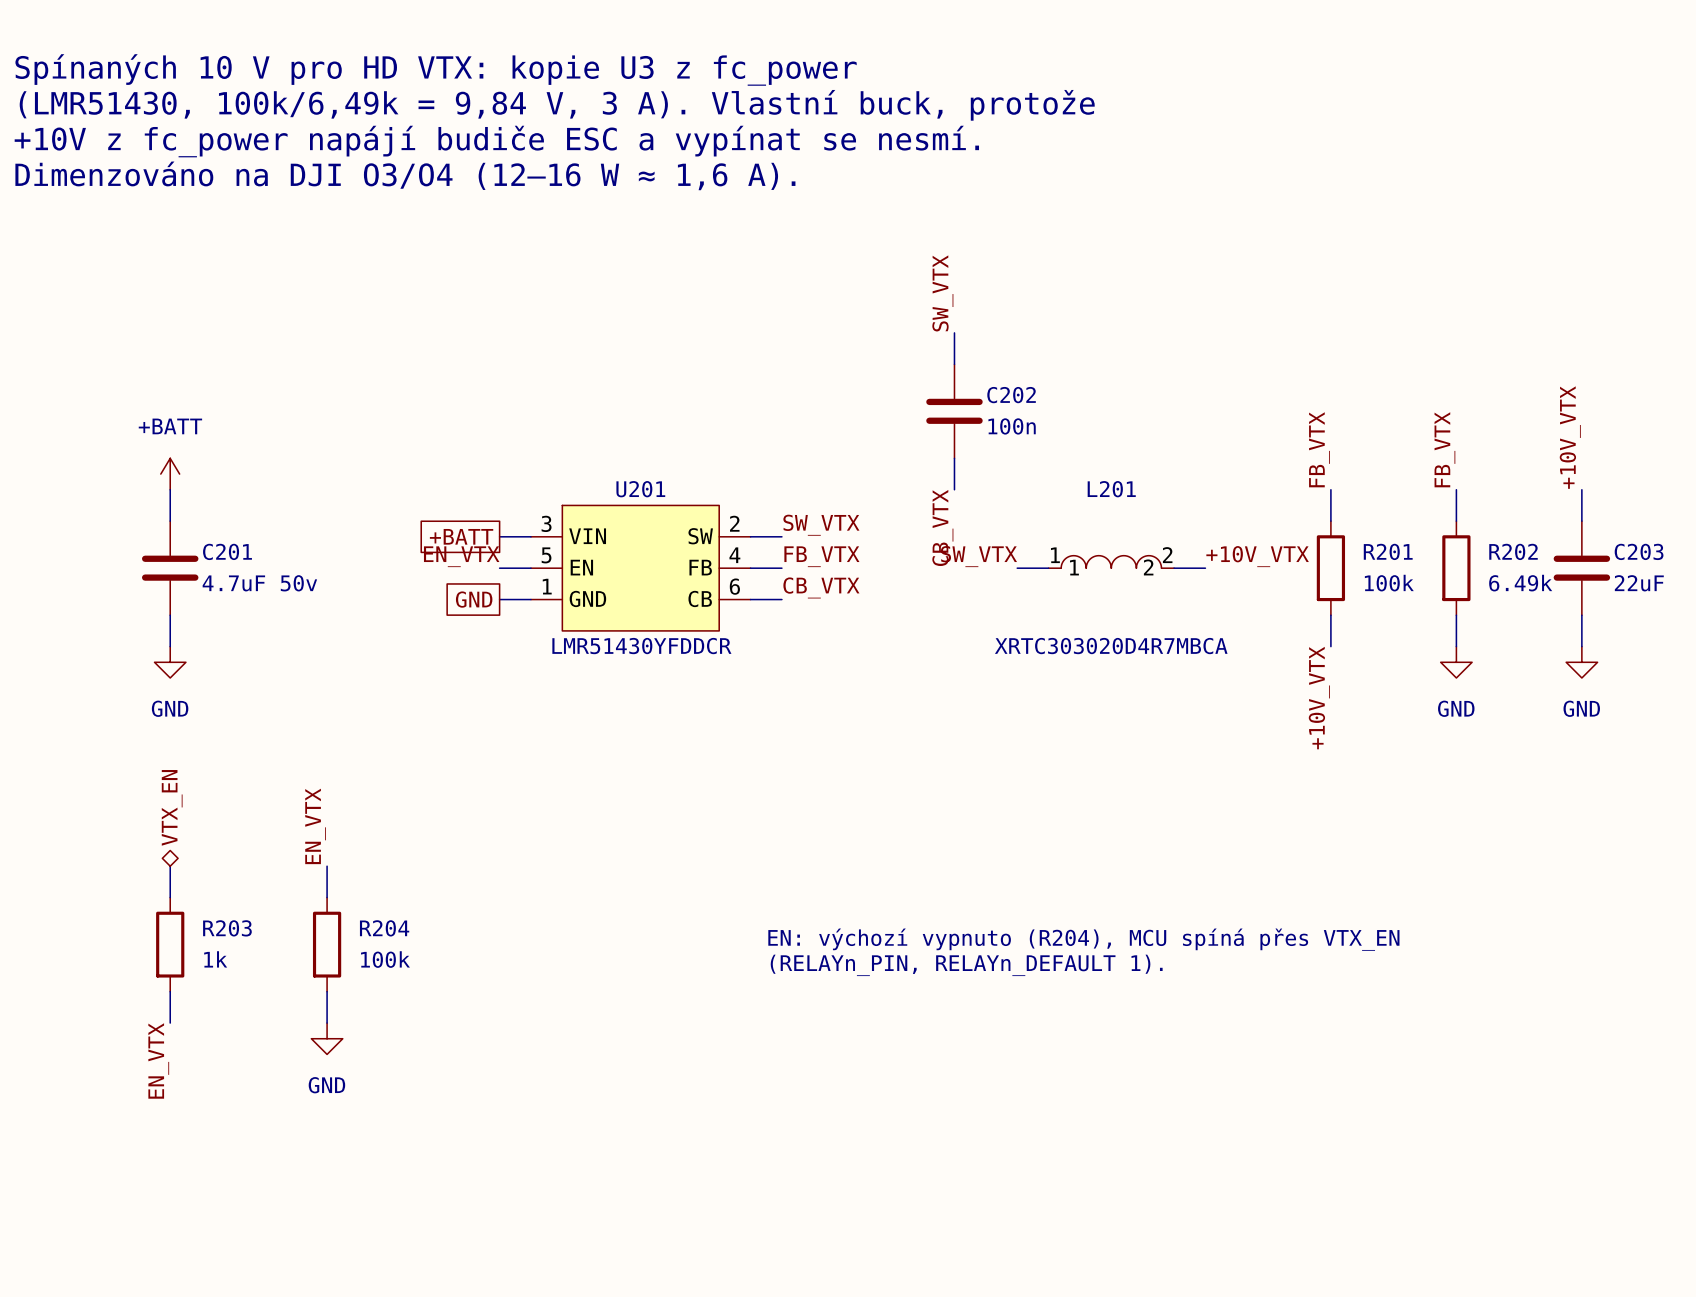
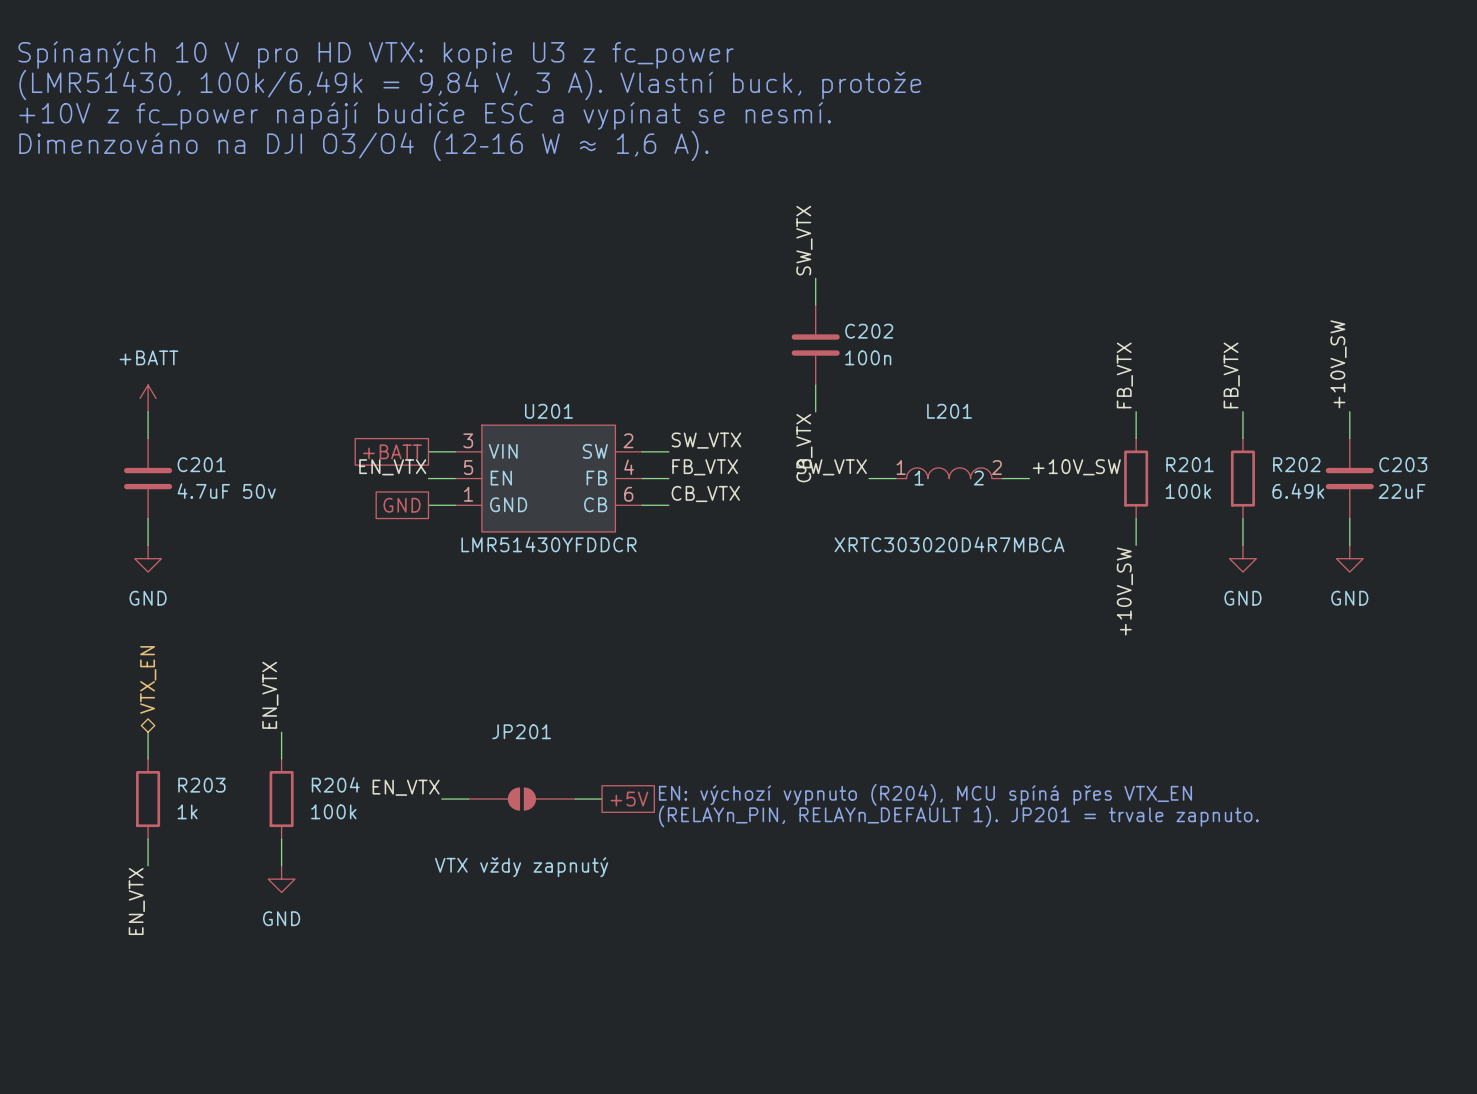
label: +10V_VTX (1570, 437) -> +10V_SW (1338, 364)
label: +10V_VTX (1257, 556) -> +10V_SW (1076, 467)
label: +10V_VTX (1319, 698) -> +10V_SW (1124, 591)
label: none -> EN_VTX (406, 787)
wire: none -> (441, 799) (468, 799)
JP201: none -> VTX vždy zapnutý (521, 799)
wire: none -> (575, 799) (602, 799)
global label: none -> +5V (629, 799)
text: (RELAYn_PIN, RELAYn_DEFAULT 1). (966, 965) -> (RELAYn_PIN, RELAYn_DEFAULT 1). JP201 = trvale zapnuto. (958, 816)

